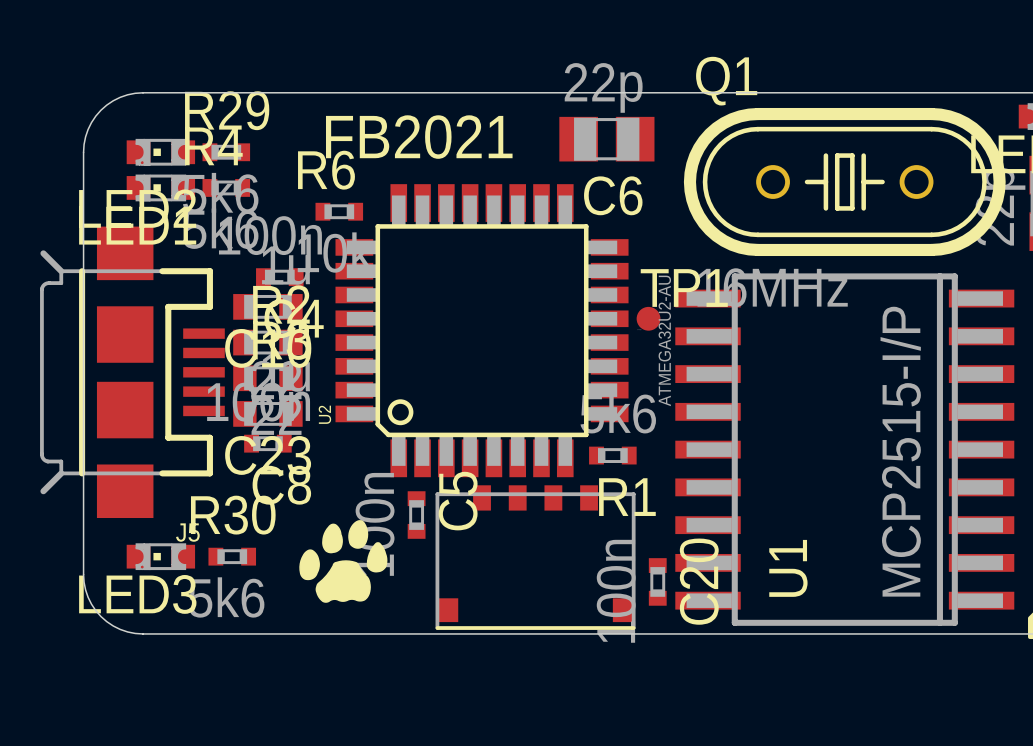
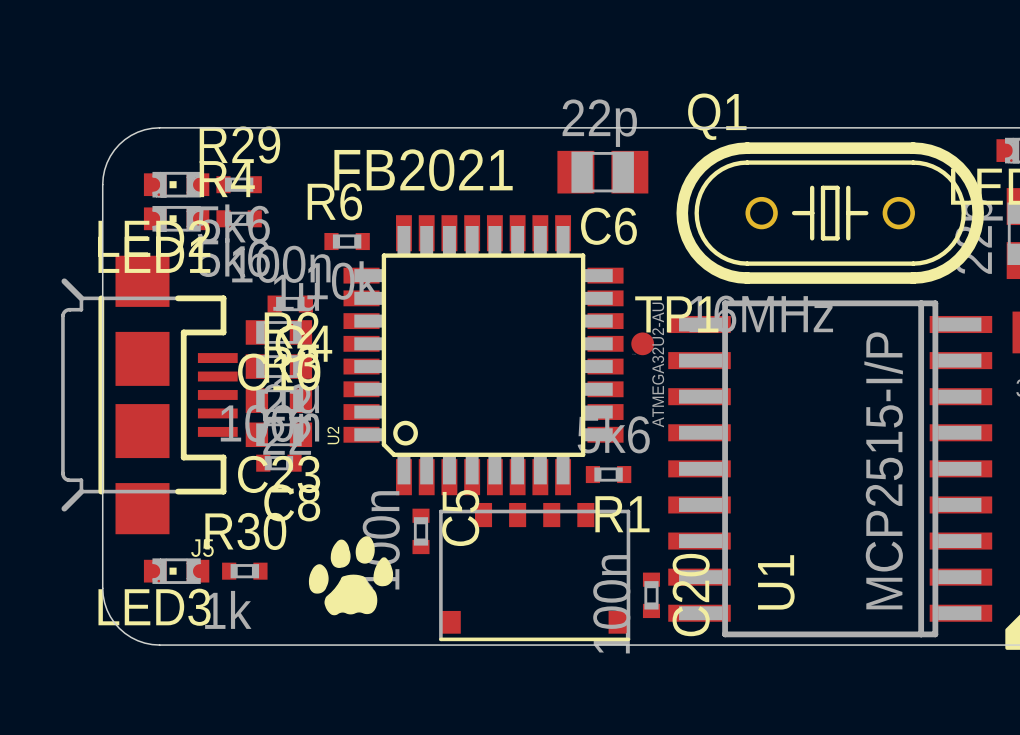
R30 value: 5k6 (226, 597) -> 1k (228, 609)

